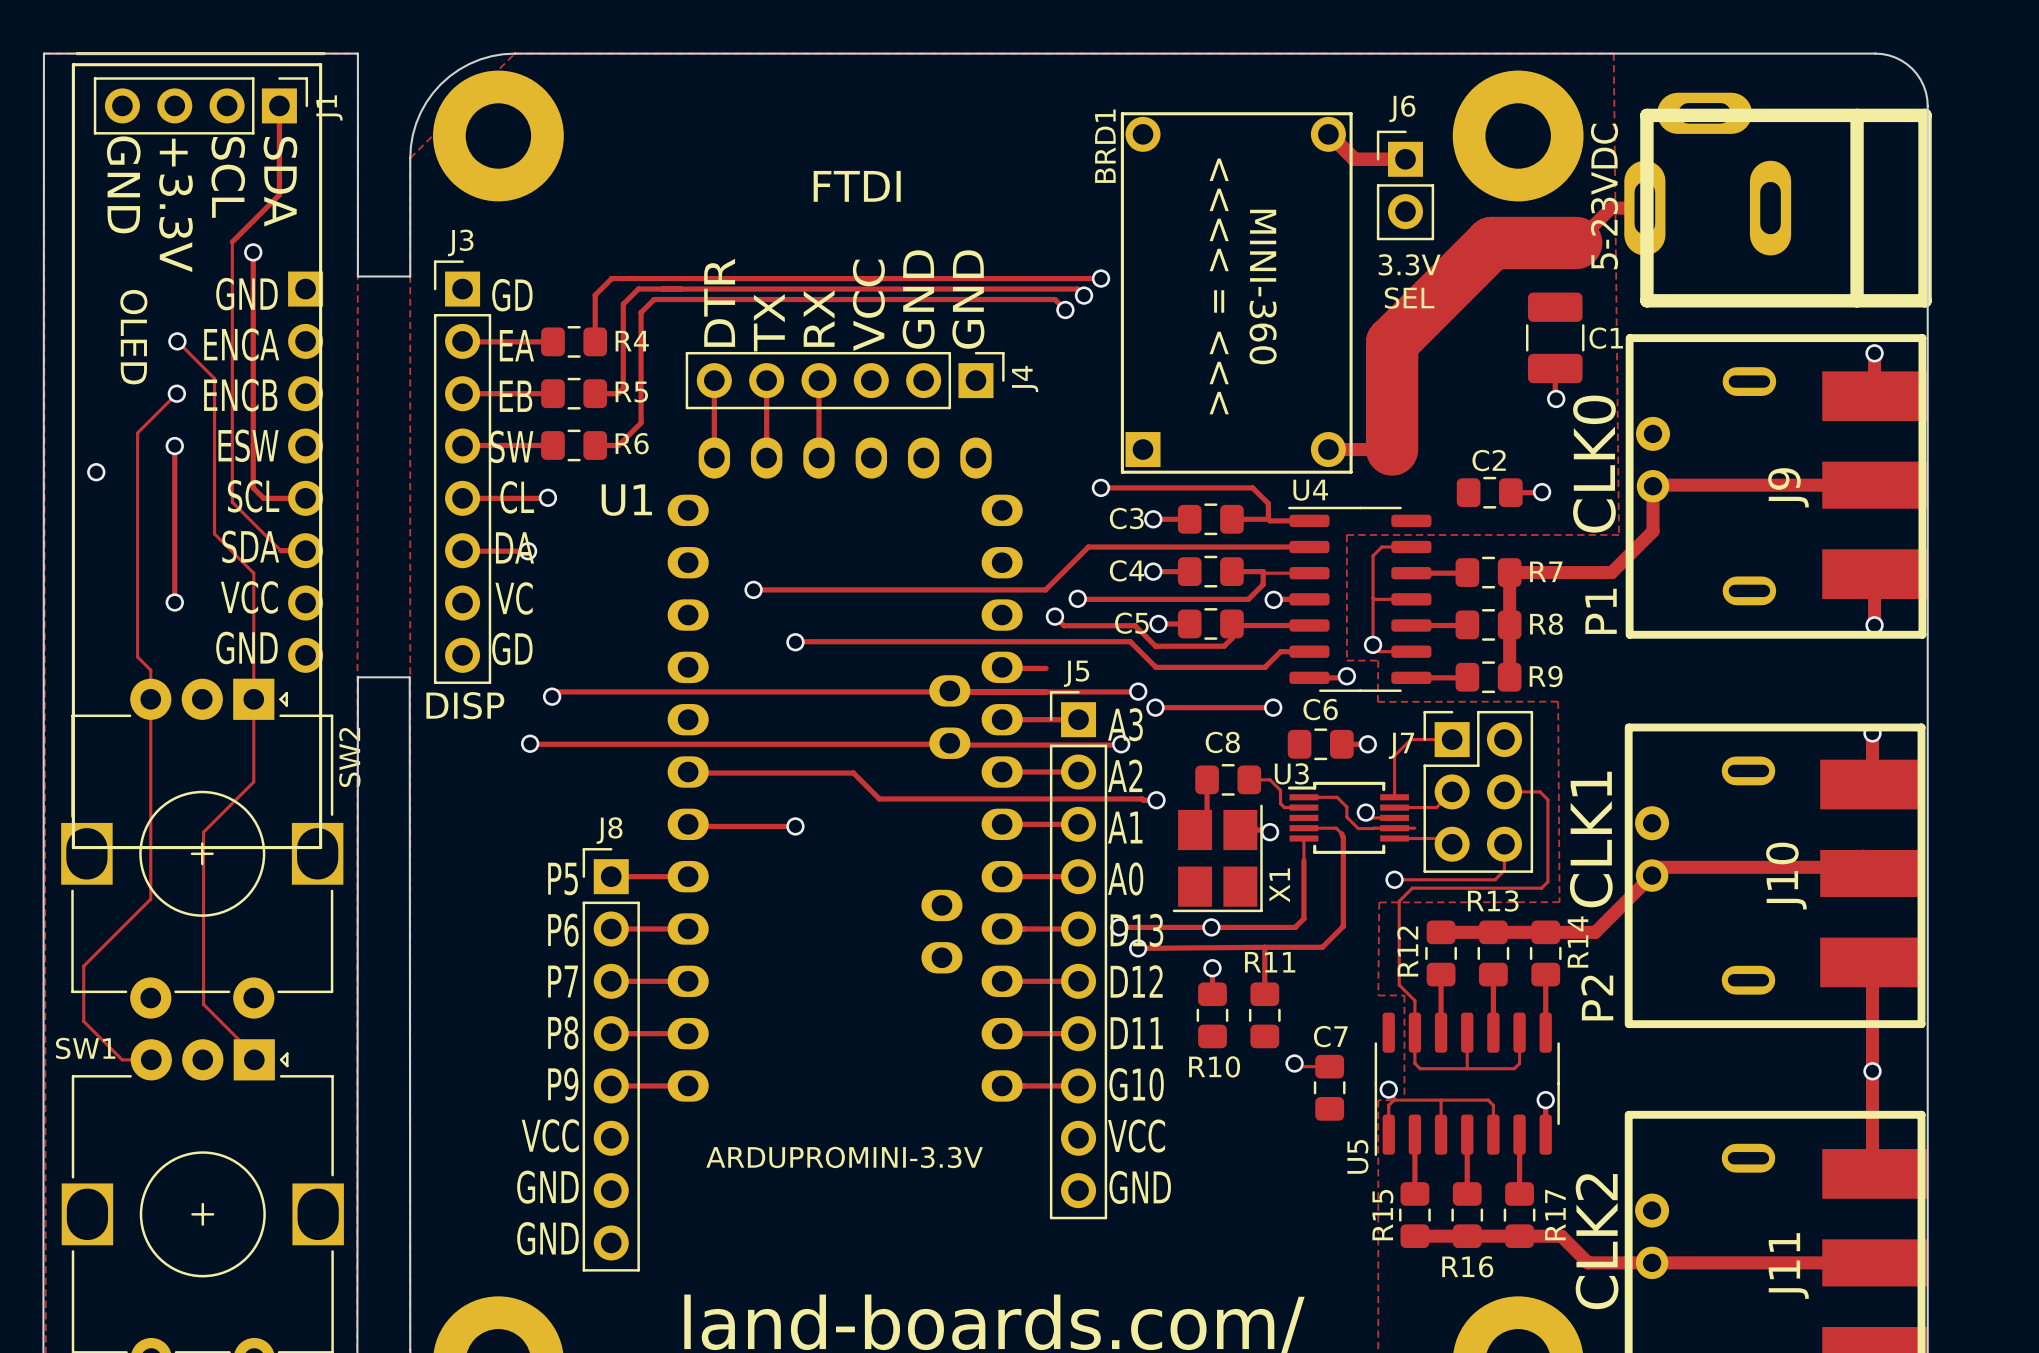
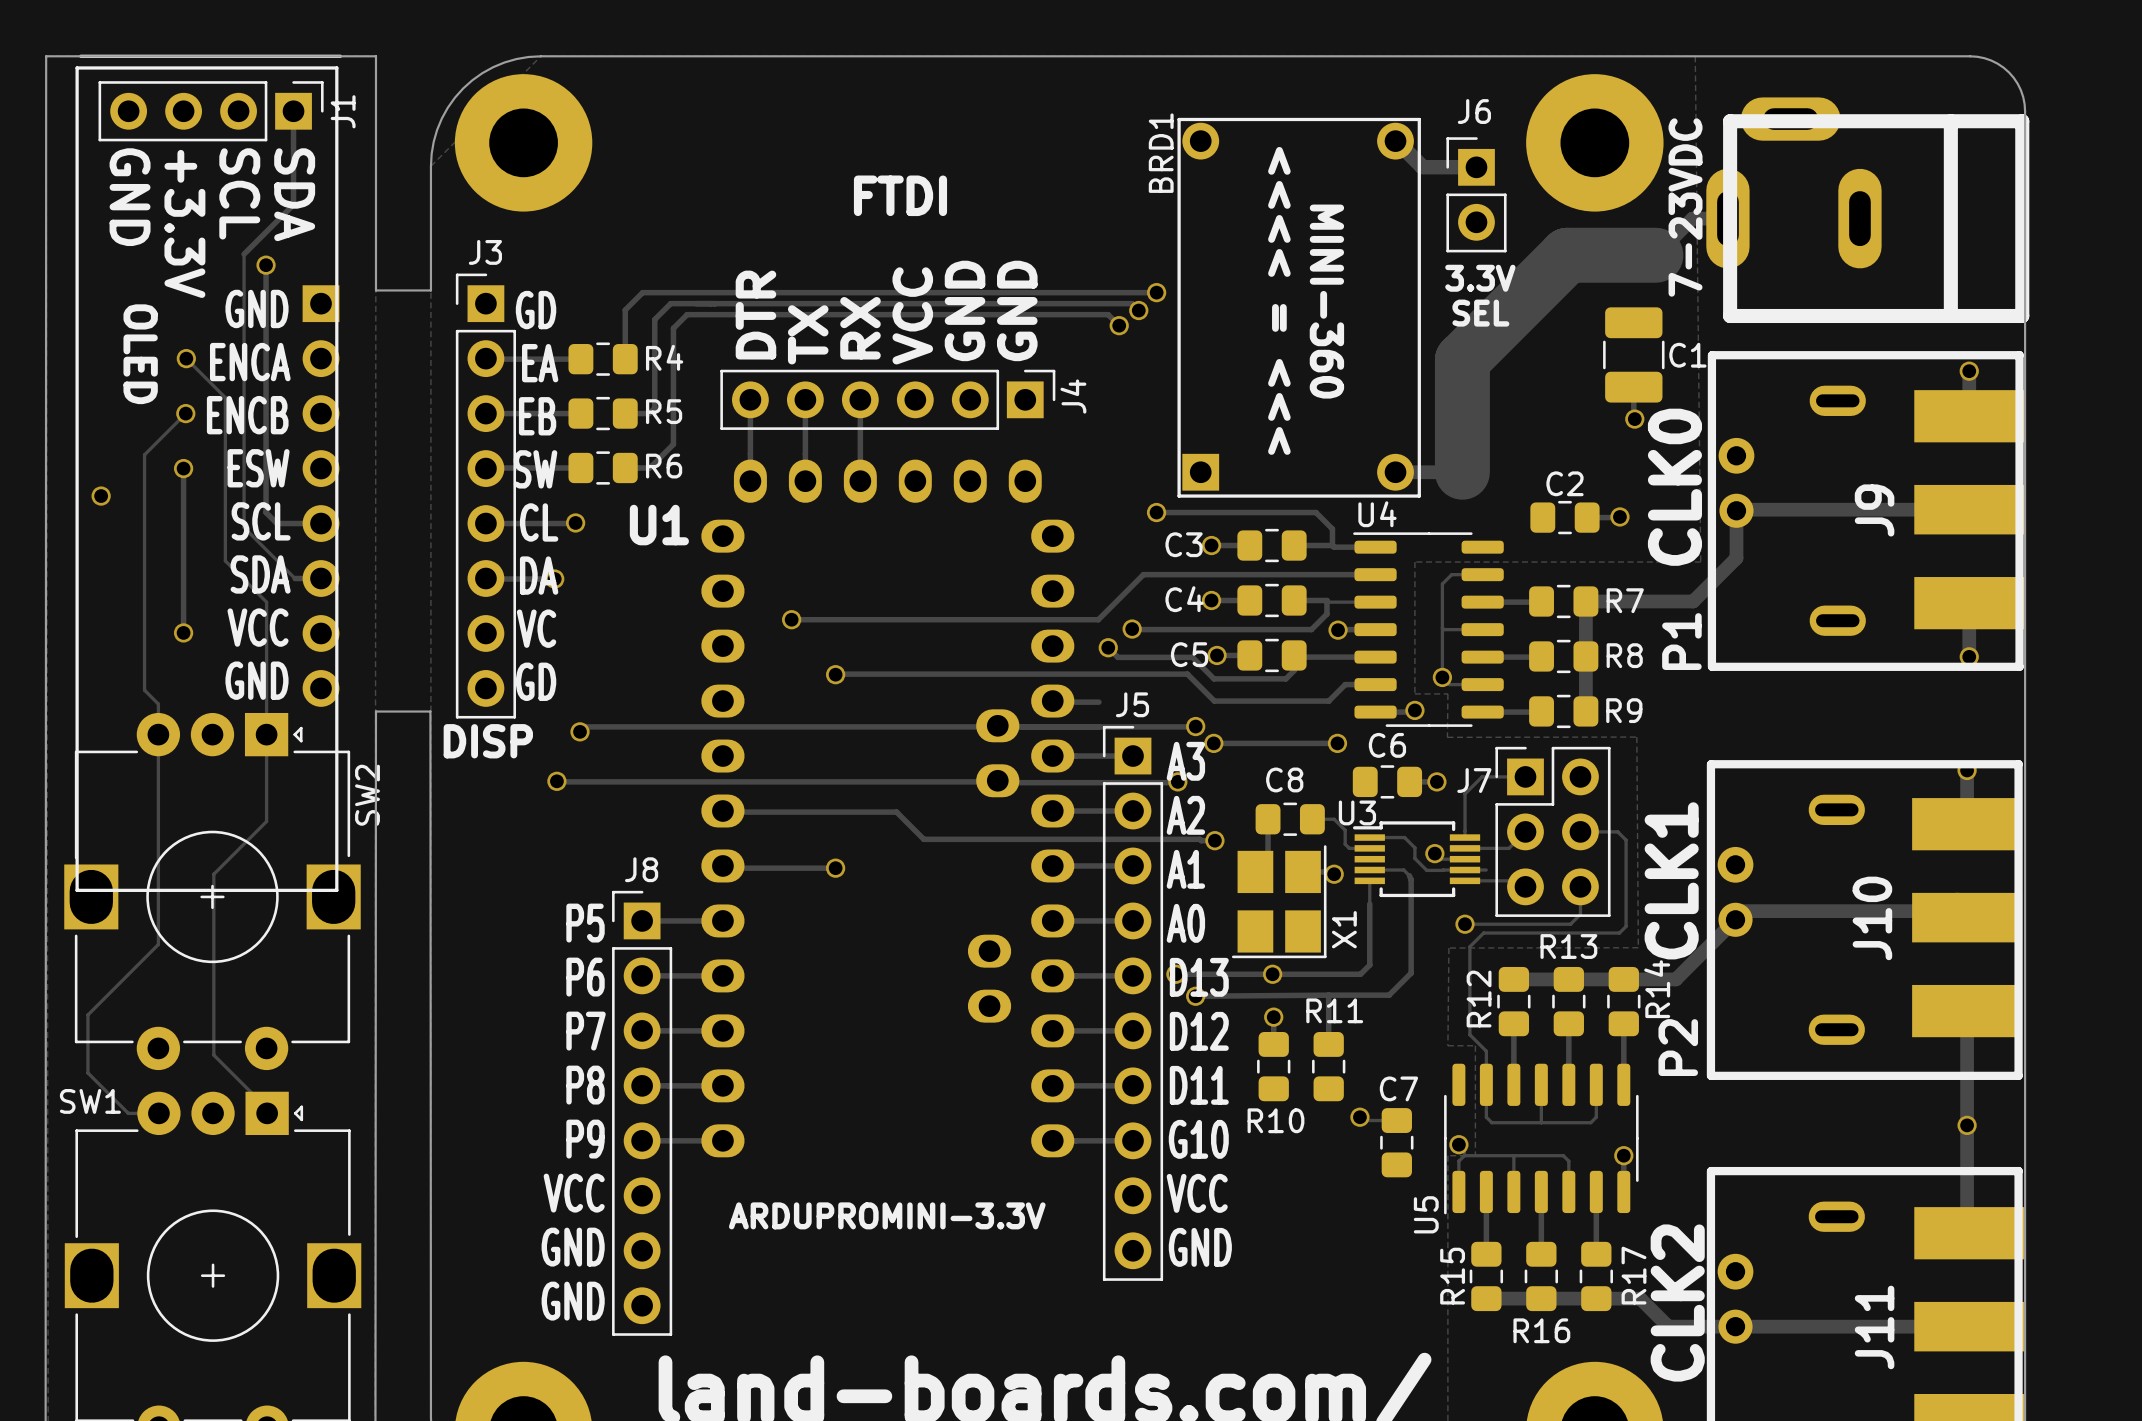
text: 5-23VDC (1604, 196) -> 7-23VDC (1685, 207)

